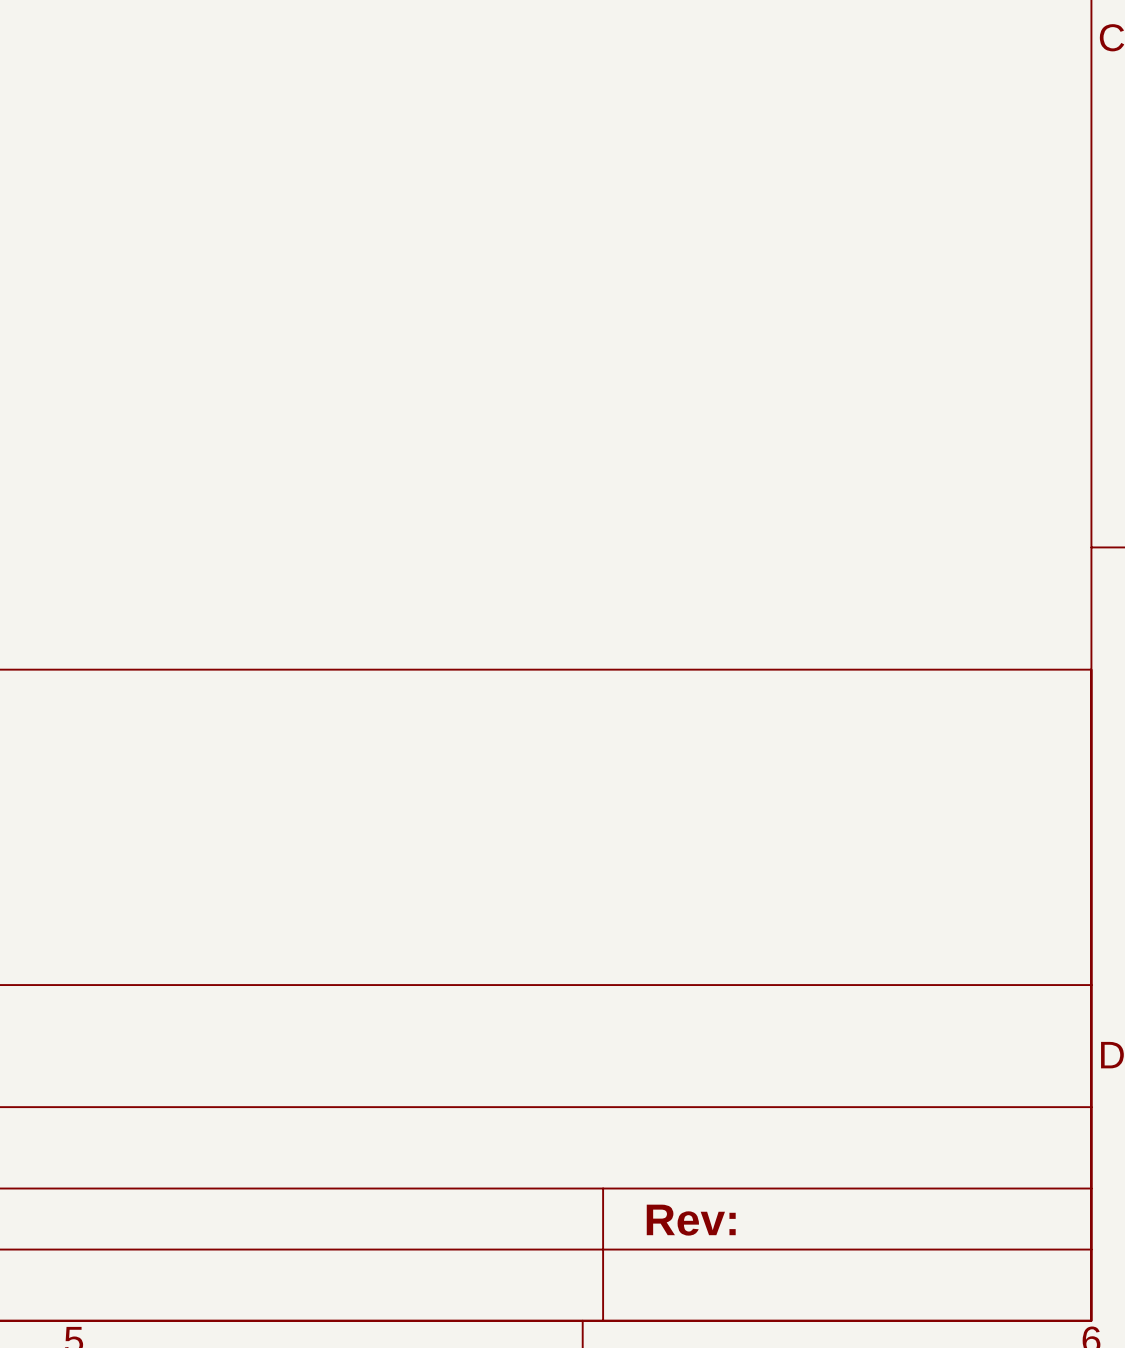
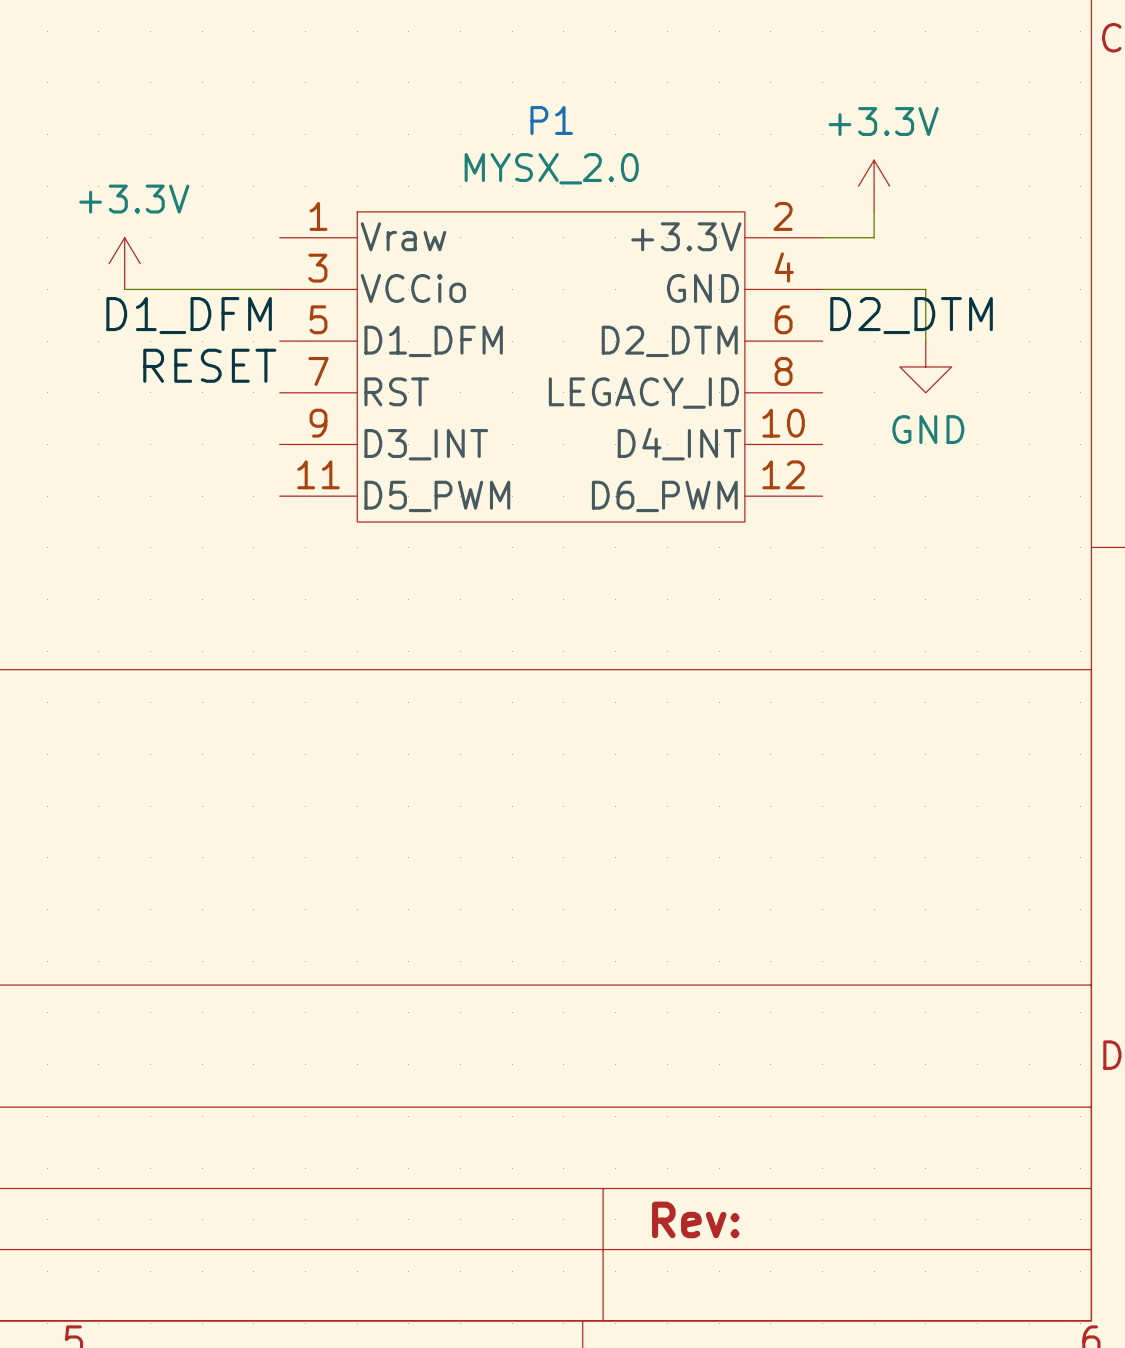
power symbol: none -> +3.3V (874, 186)
wire: none -> (874, 211) (874, 237) (822, 237)
power symbol: none -> +3.3V (124, 263)
wire: none -> (124, 289) (279, 289)
wire: none -> (822, 289) (925, 289) (925, 341)
label: none -> D1_DFM (189, 315)
label: none -> D2_DTM (911, 315)
label: none -> RESET (209, 365)
P1: none -> MYSX_2.0 (551, 366)
power symbol: none -> GND (925, 366)

